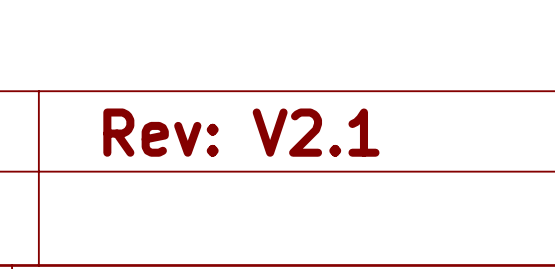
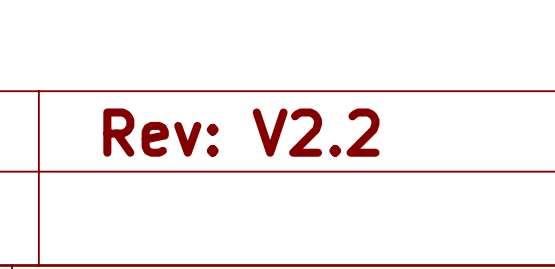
title block: Rev: V2.1 (241, 132) -> Rev: V2.2 (241, 132)

